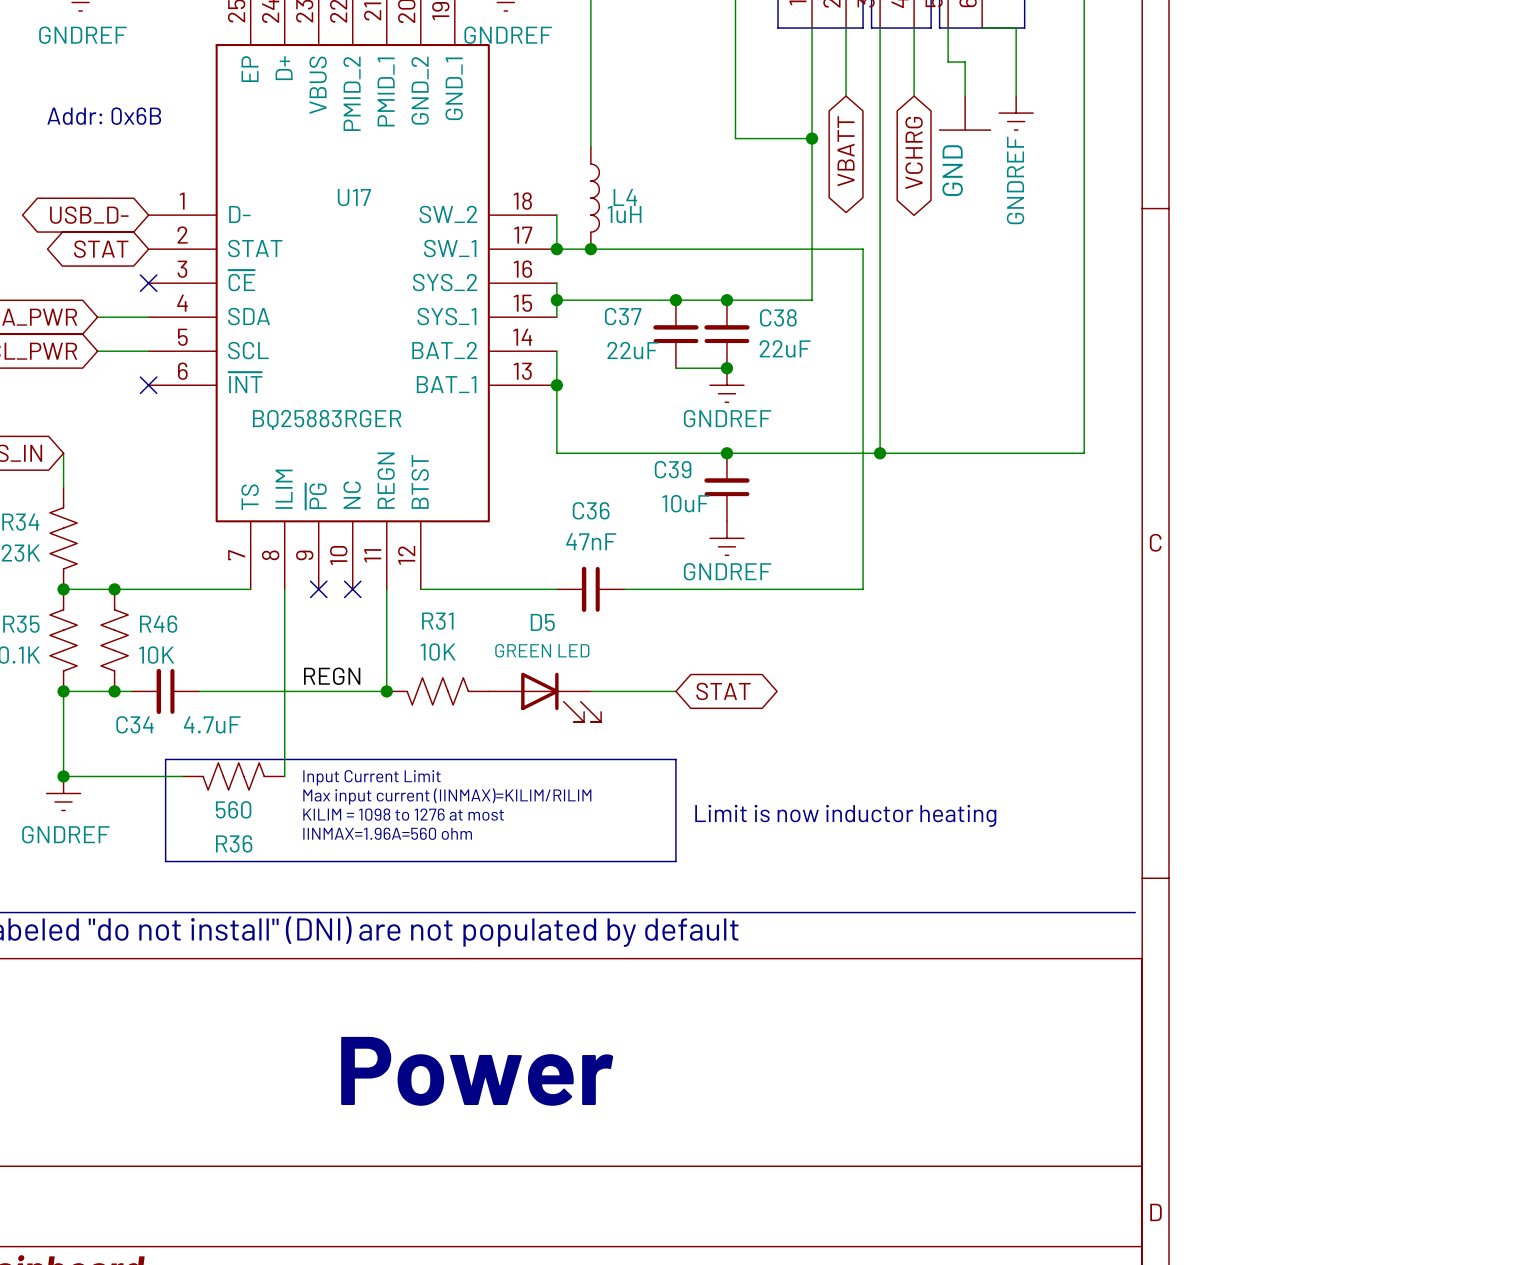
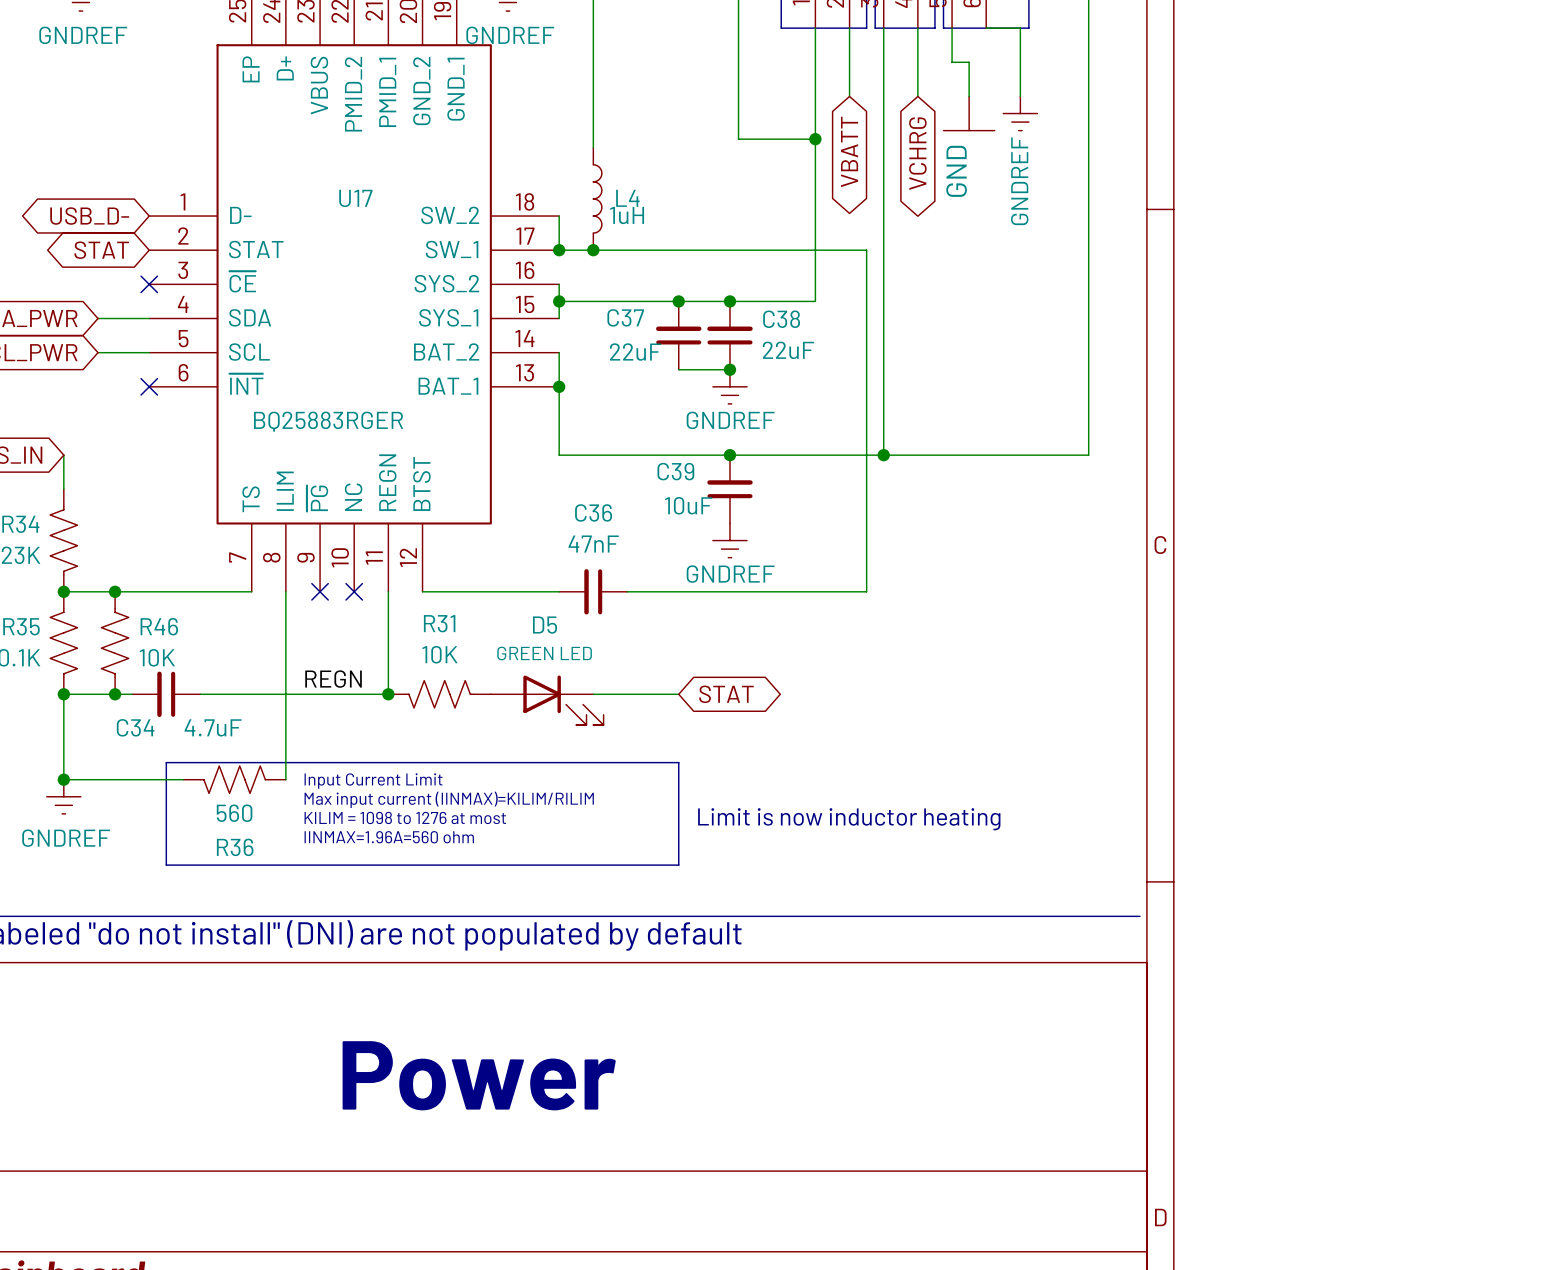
text: Addr: 0x6B (104, 116) -> none

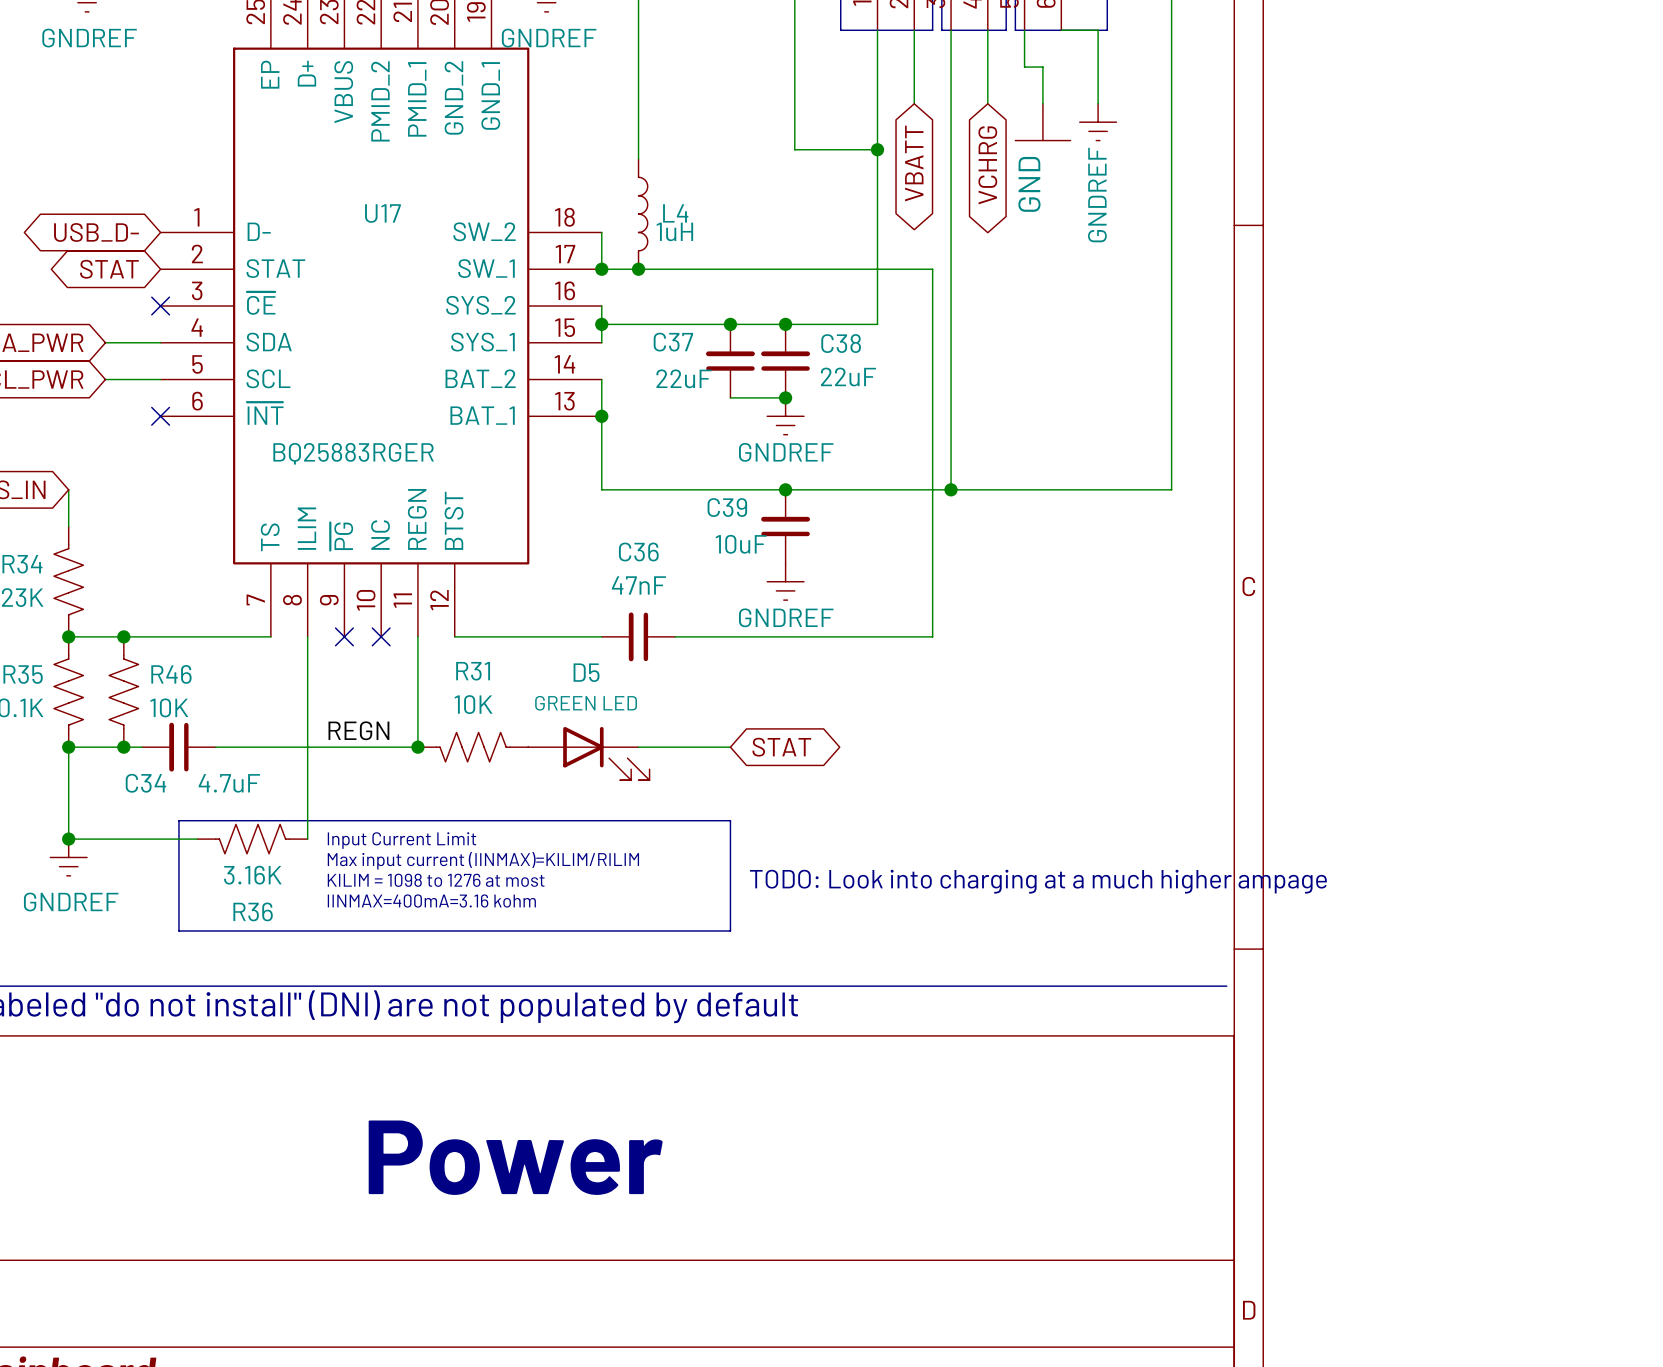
R36 value: 560 (234, 813) -> 3.16K (252, 875)
text: Limit is now inductor heating (849, 819) -> TODO: Look into charging at a much higher ampage (1038, 881)
text: IINMAX=1.96A=560 ohm (389, 837) -> IINMAX=400mA=3.16 kohm (431, 901)

